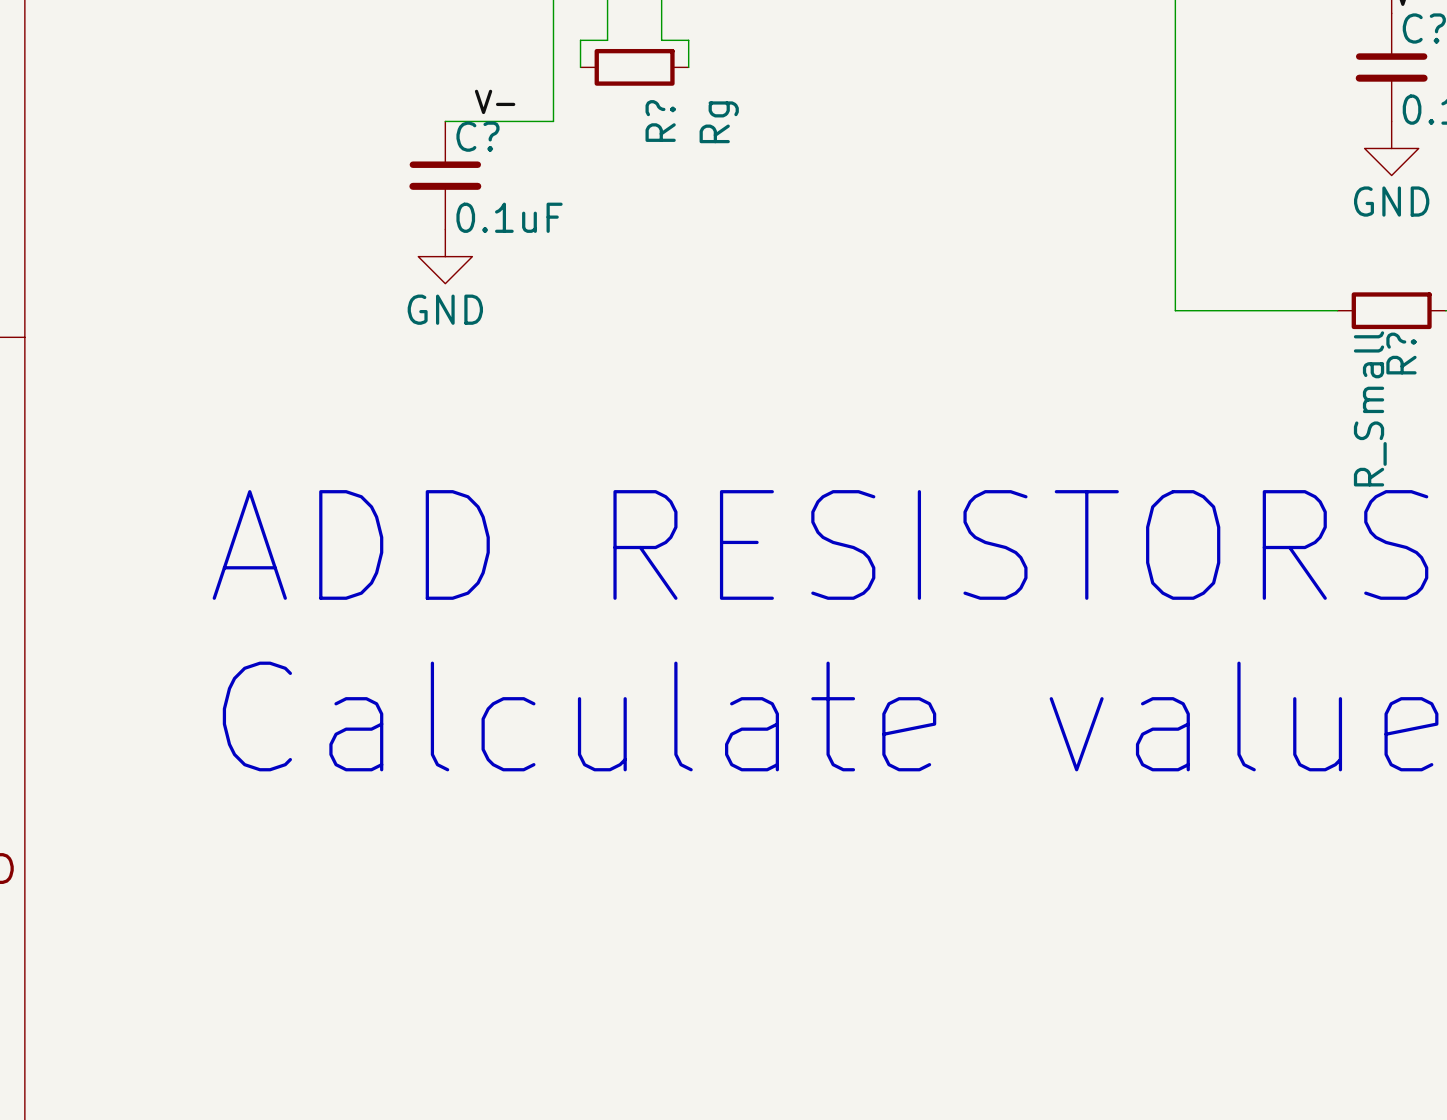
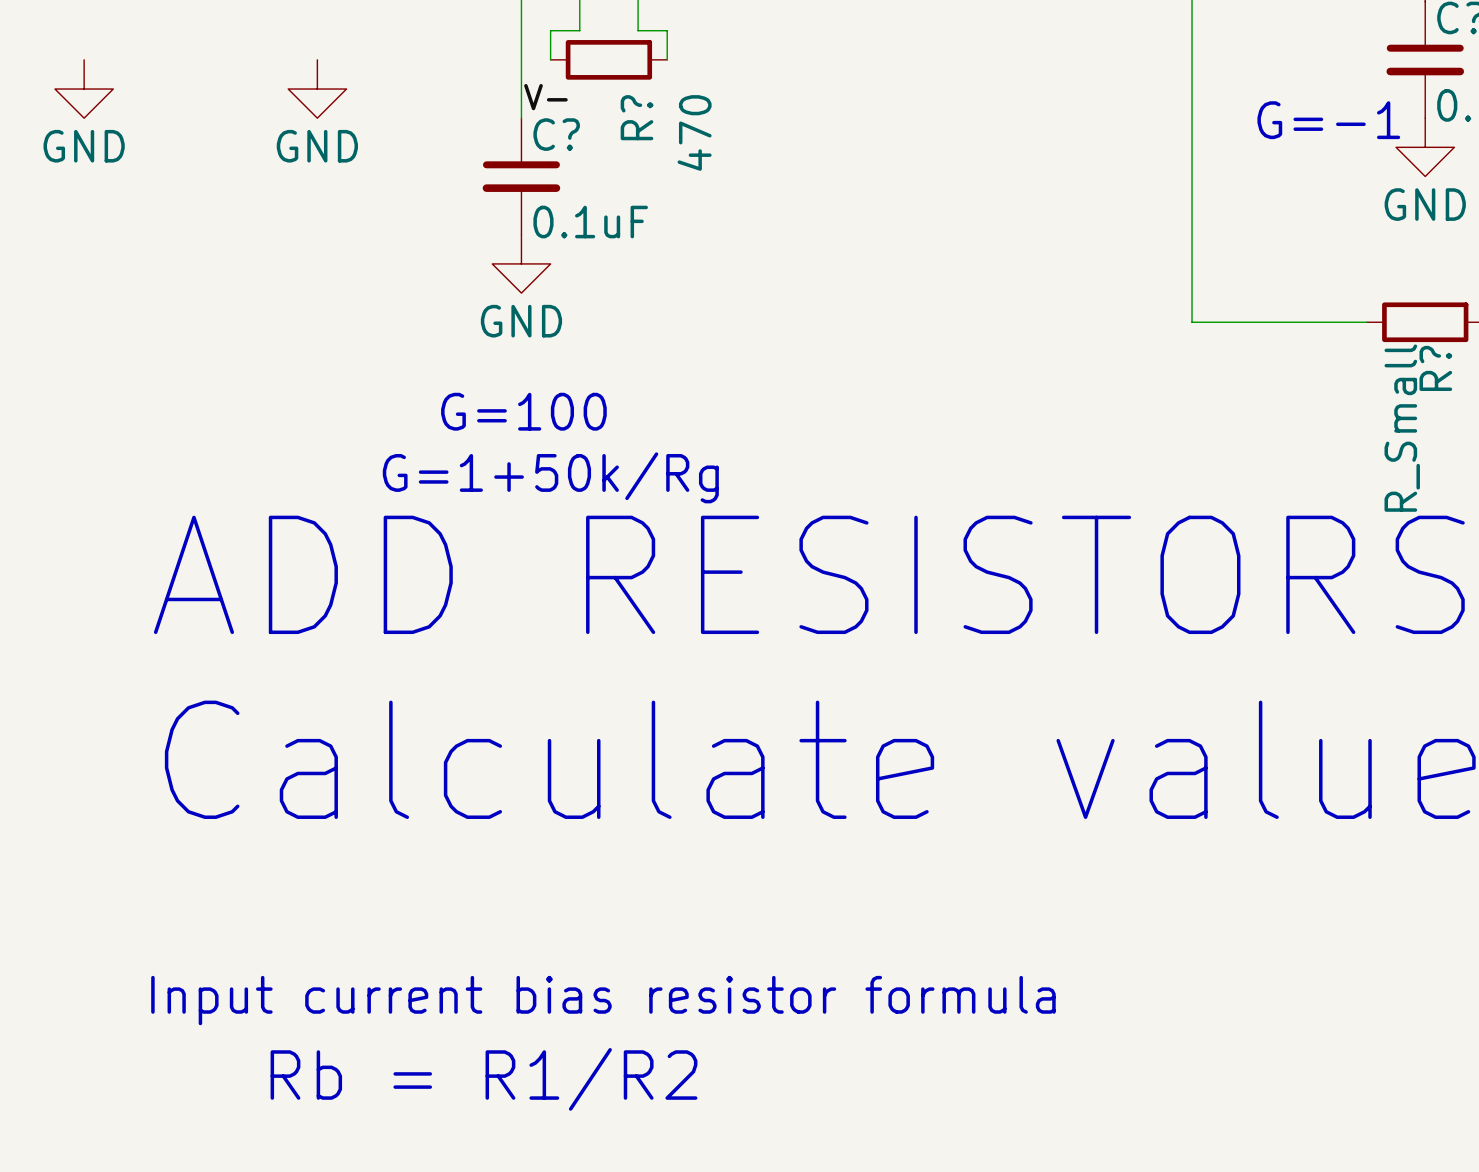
power symbol: none -> GND (84, 89)
power symbol: none -> GND (317, 89)
label position: V- (495, 101) -> V- (545, 97)
wire: (445, 121) (553, 121) -> none
R? value: Rg (719, 122) -> 470 (694, 132)
text: none -> G=-1 (1328, 120)
C? position: (445, 175) -> (521, 176)
power symbol: GND (445, 256) -> none
power symbol: none -> GND (521, 263)
text: none -> G=100 (523, 411)
text: none -> G=1+50k/Rg (550, 477)
text: none -> Input current bias resistor formula (603, 1000)
text: none -> Rb = R1/R2 (484, 1079)

